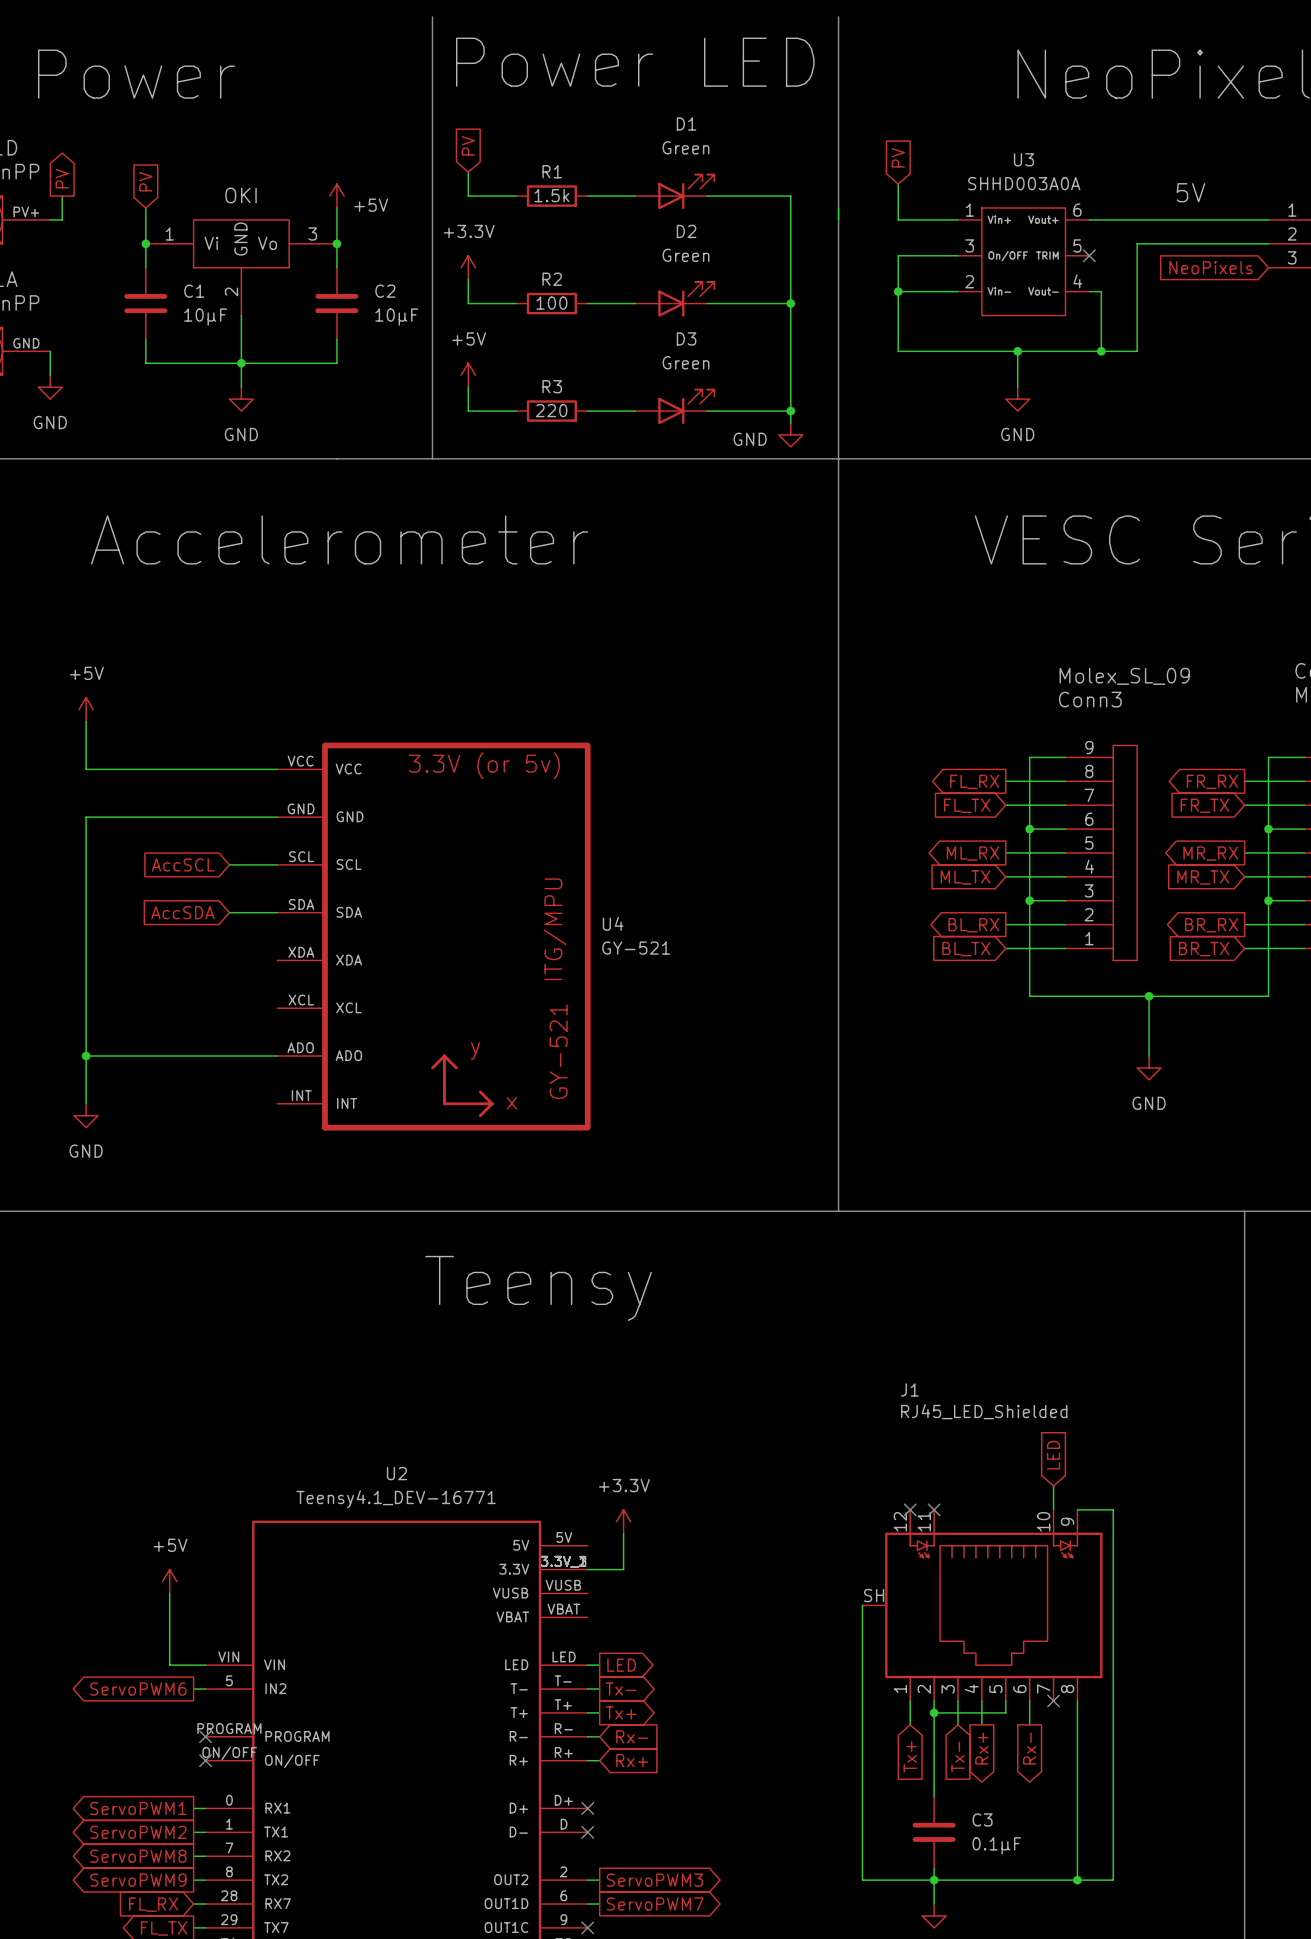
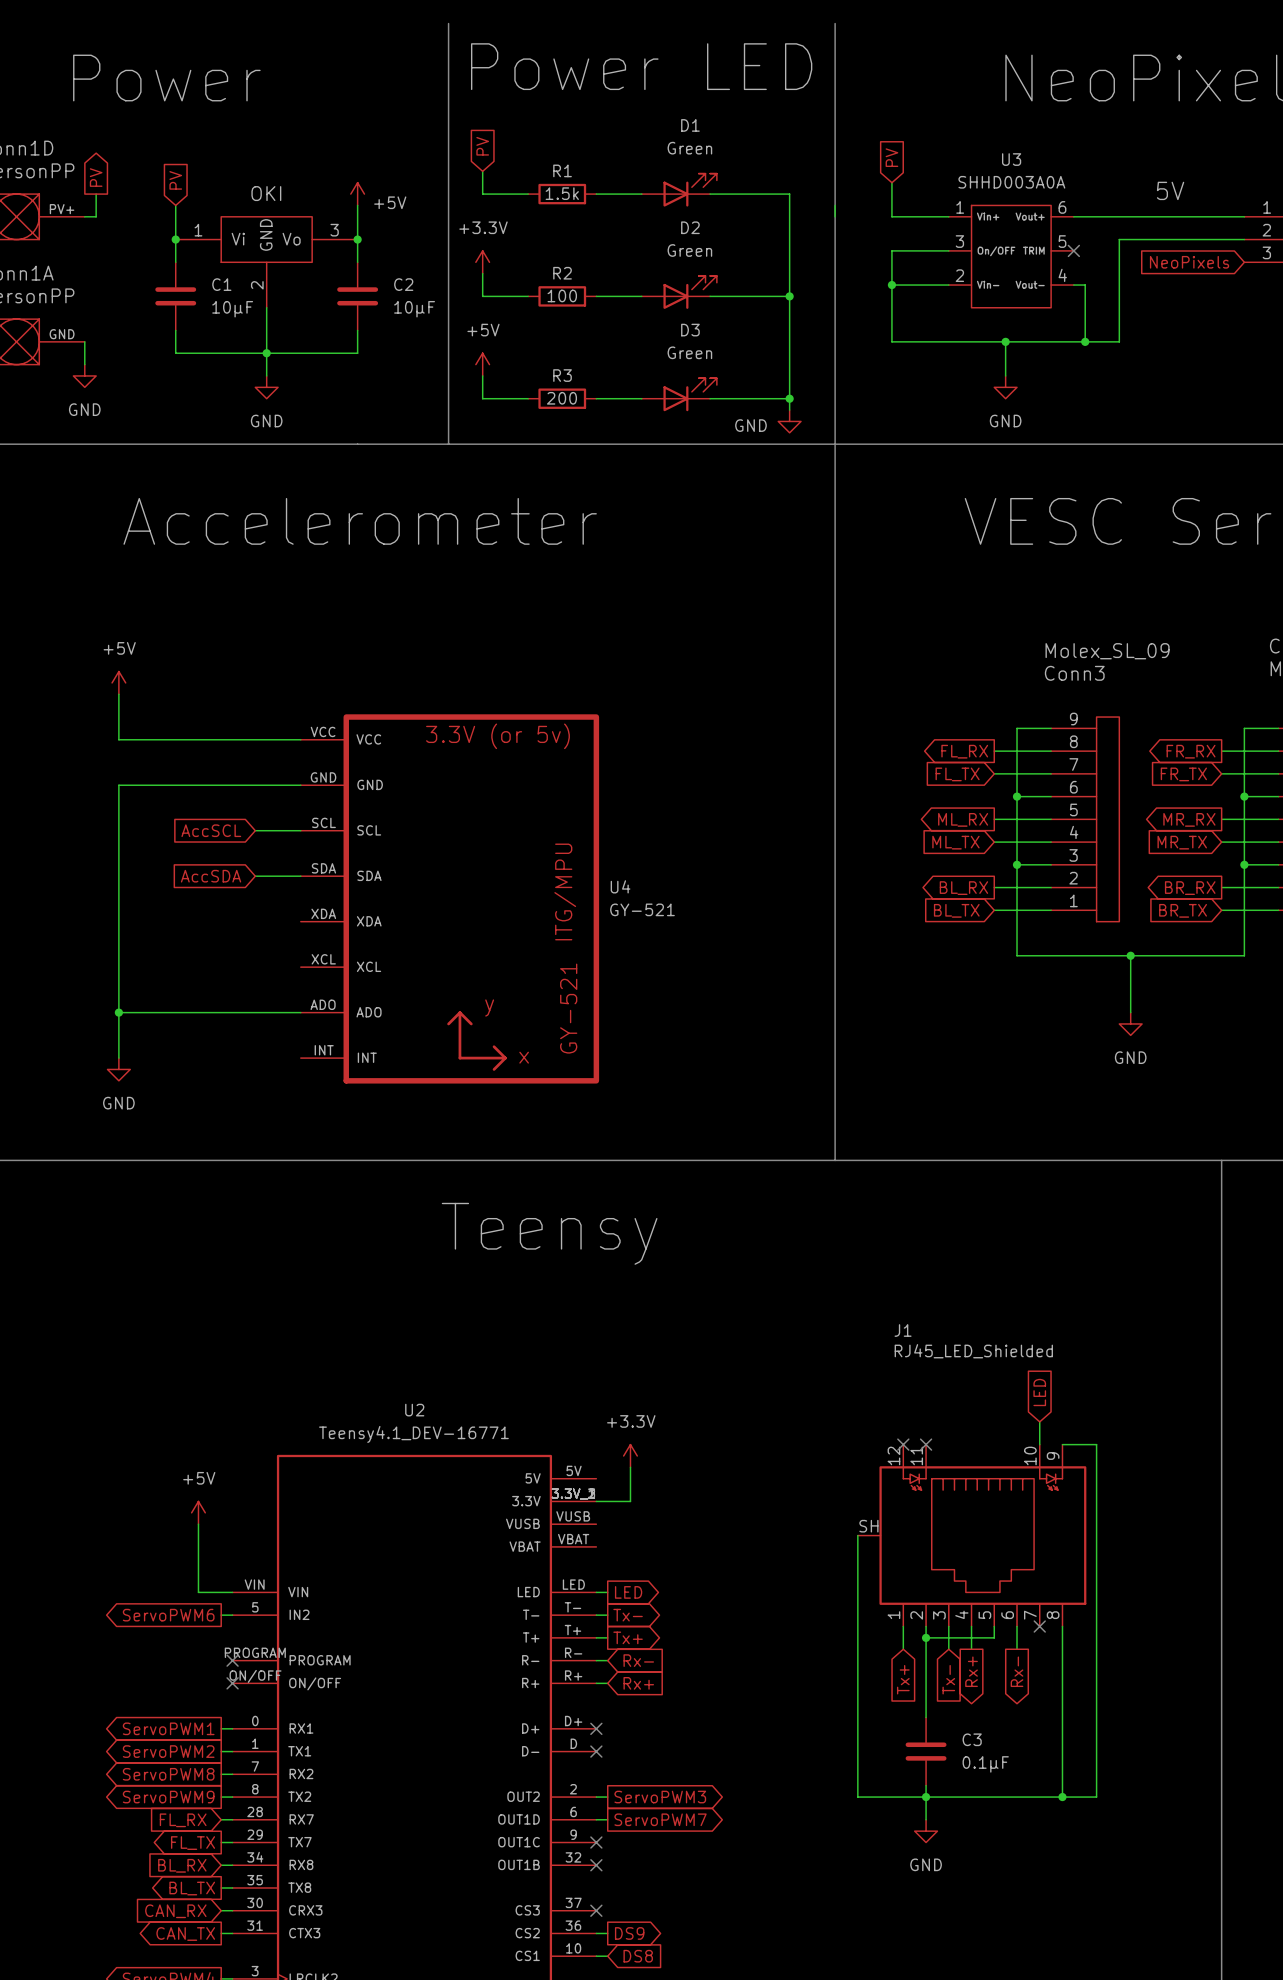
R3 value: 220 (551, 410) -> 200 (561, 398)

